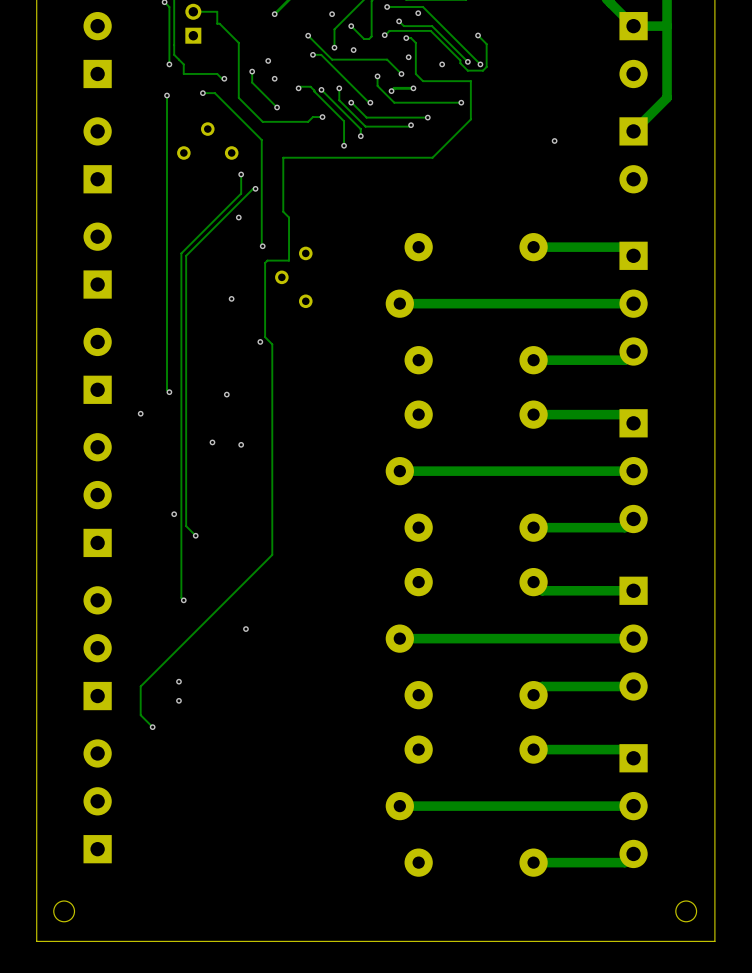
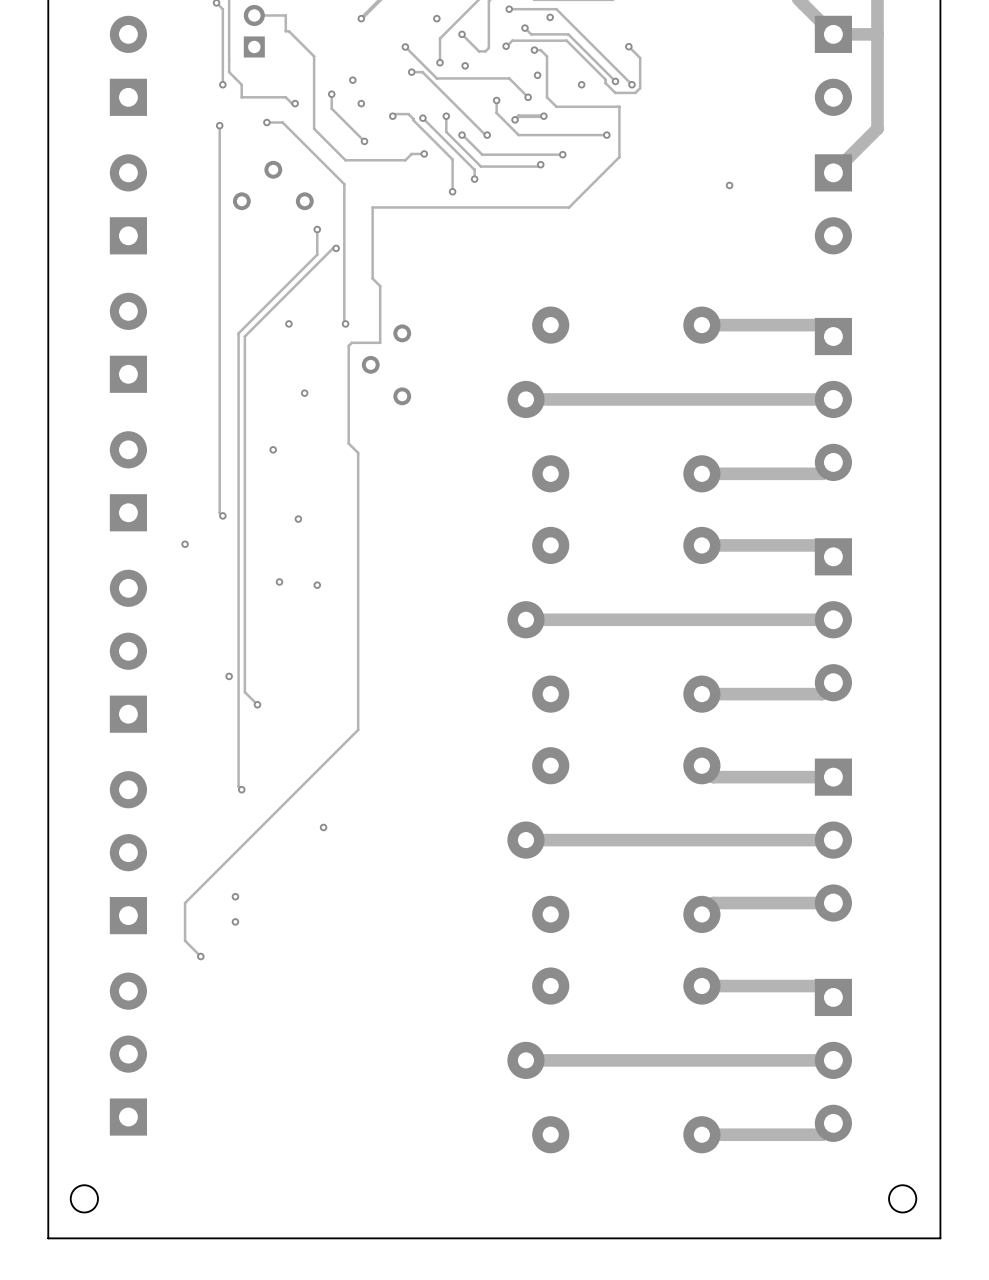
via position: (238, 217) -> (288, 323)
via: none -> (273, 449)
via: (260, 341) -> none

